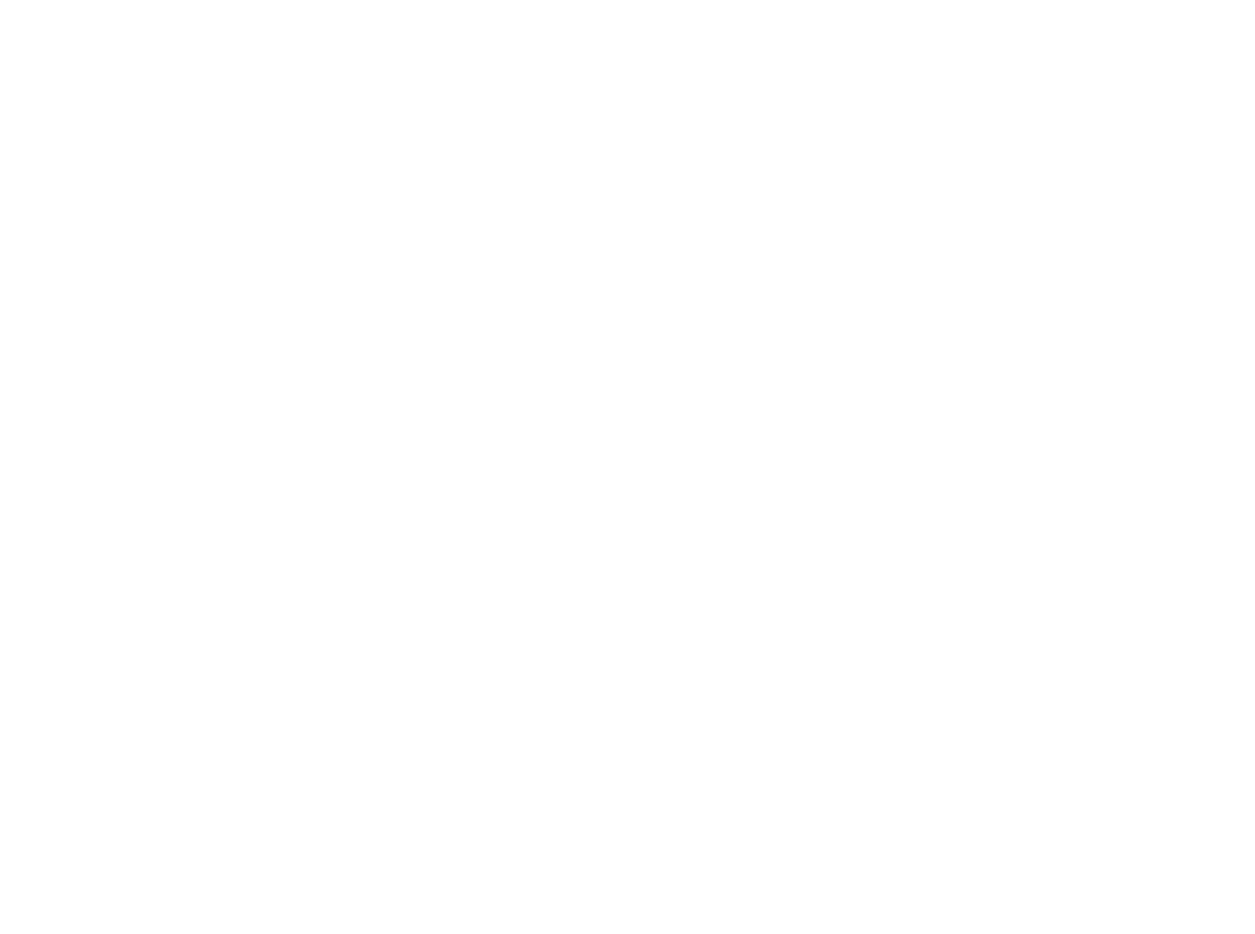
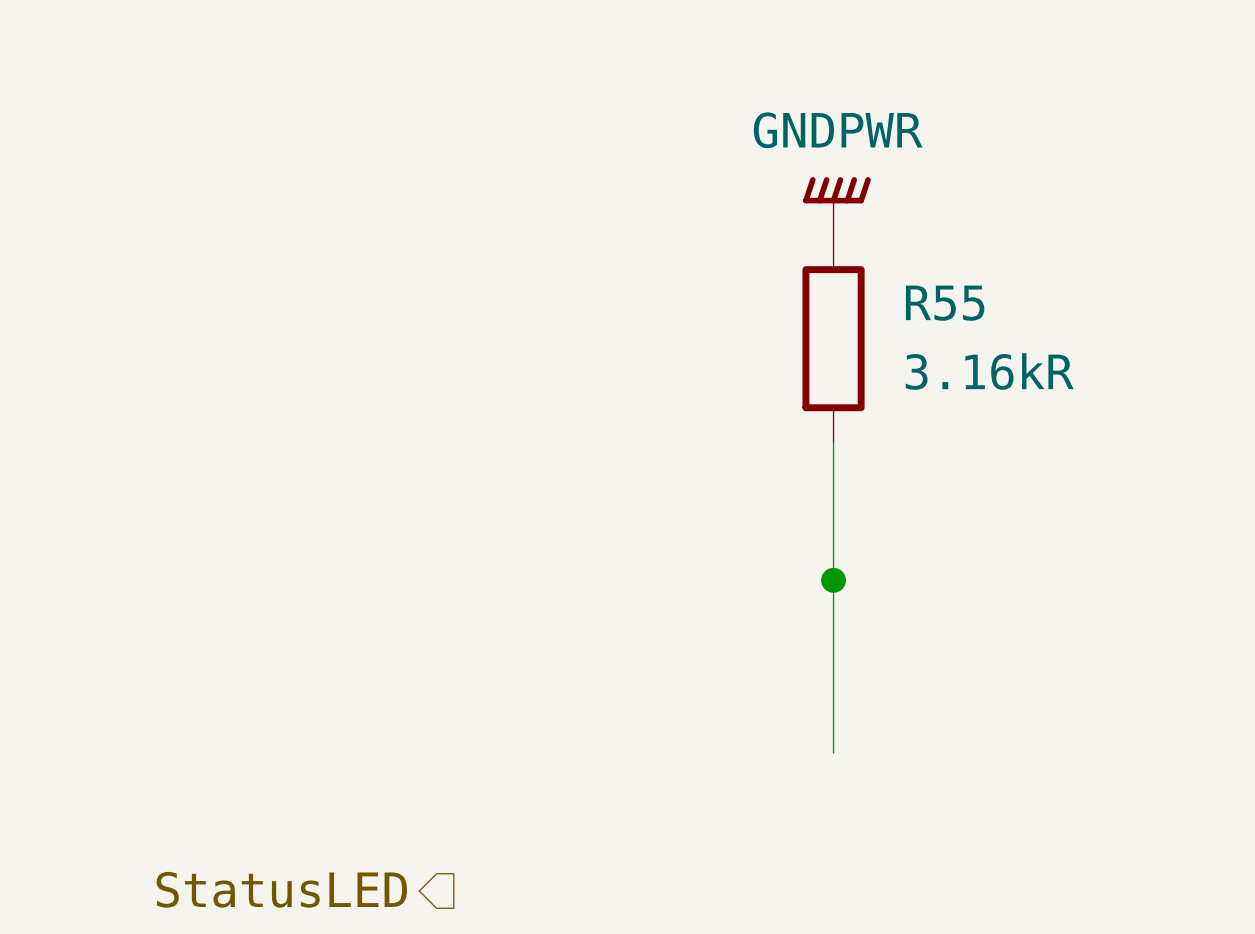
power symbol: none -> GNDPWR (836, 206)
R55: none -> 3.16kR (833, 338)
wire: none -> (833, 442) (833, 752)
junction: none -> (833, 580)
hierarchical label: none -> StatusLED (281, 889)

